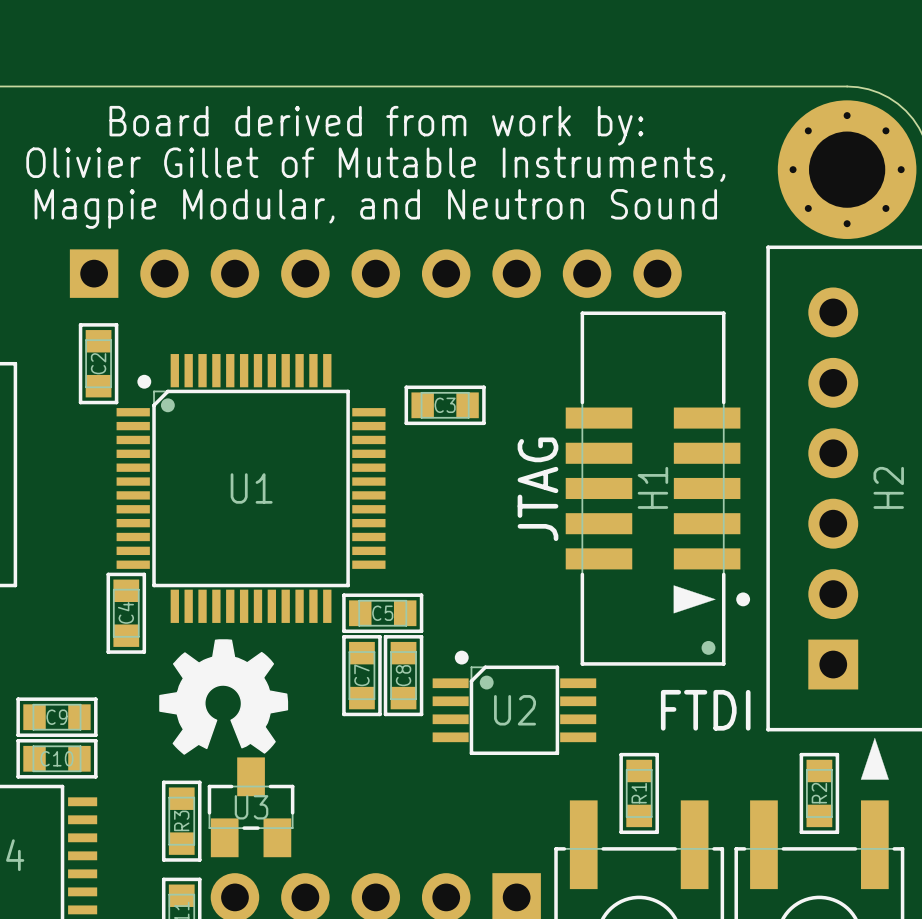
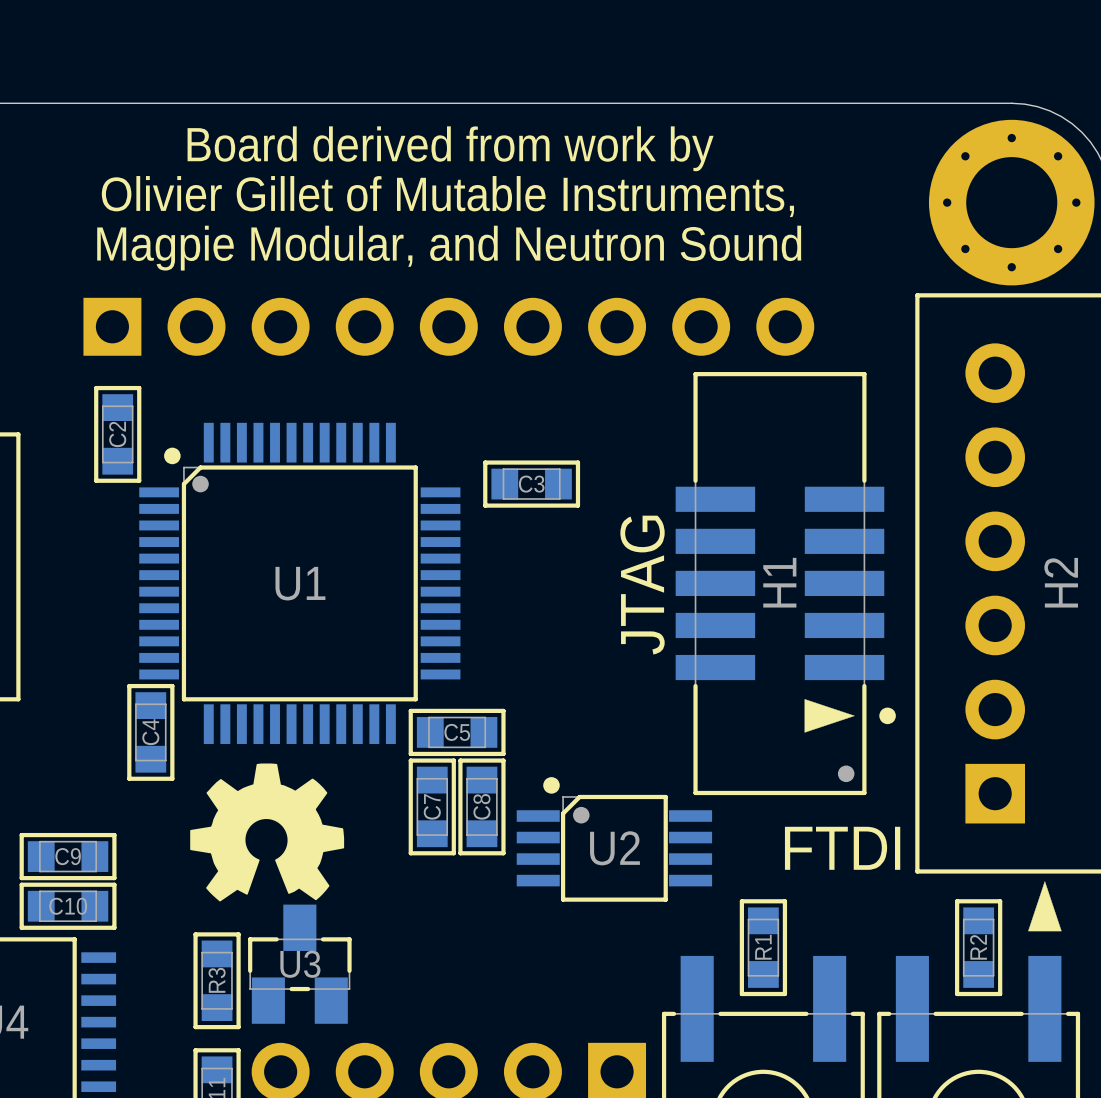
text: Board derived from work by: (376, 125) -> Board derived from work by (450, 148)

